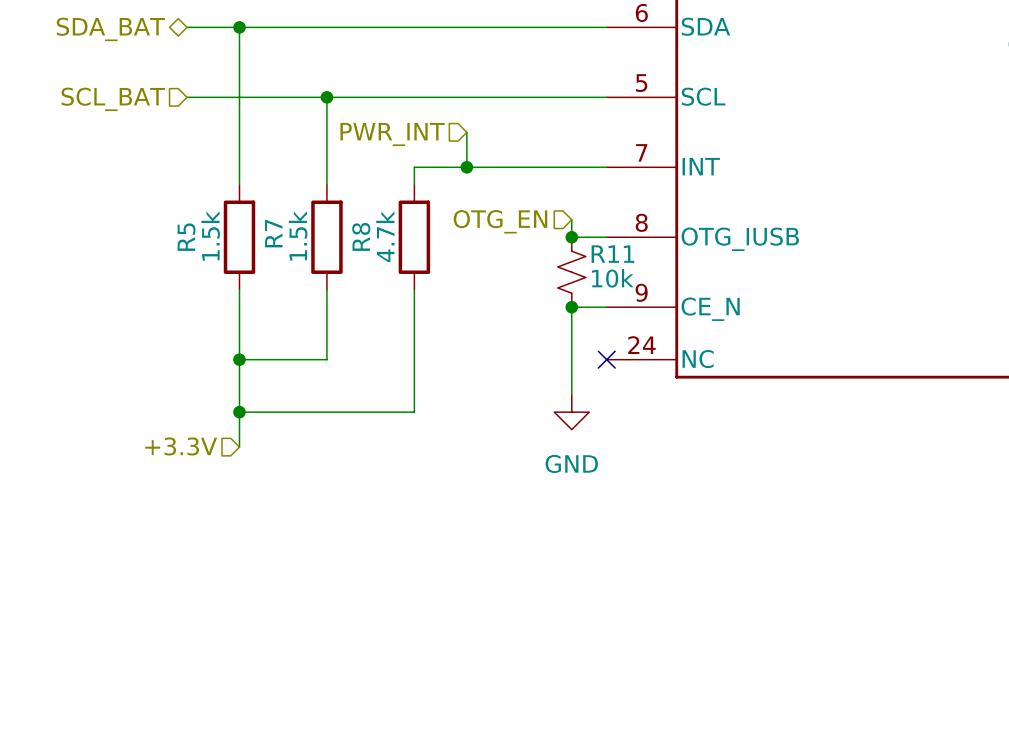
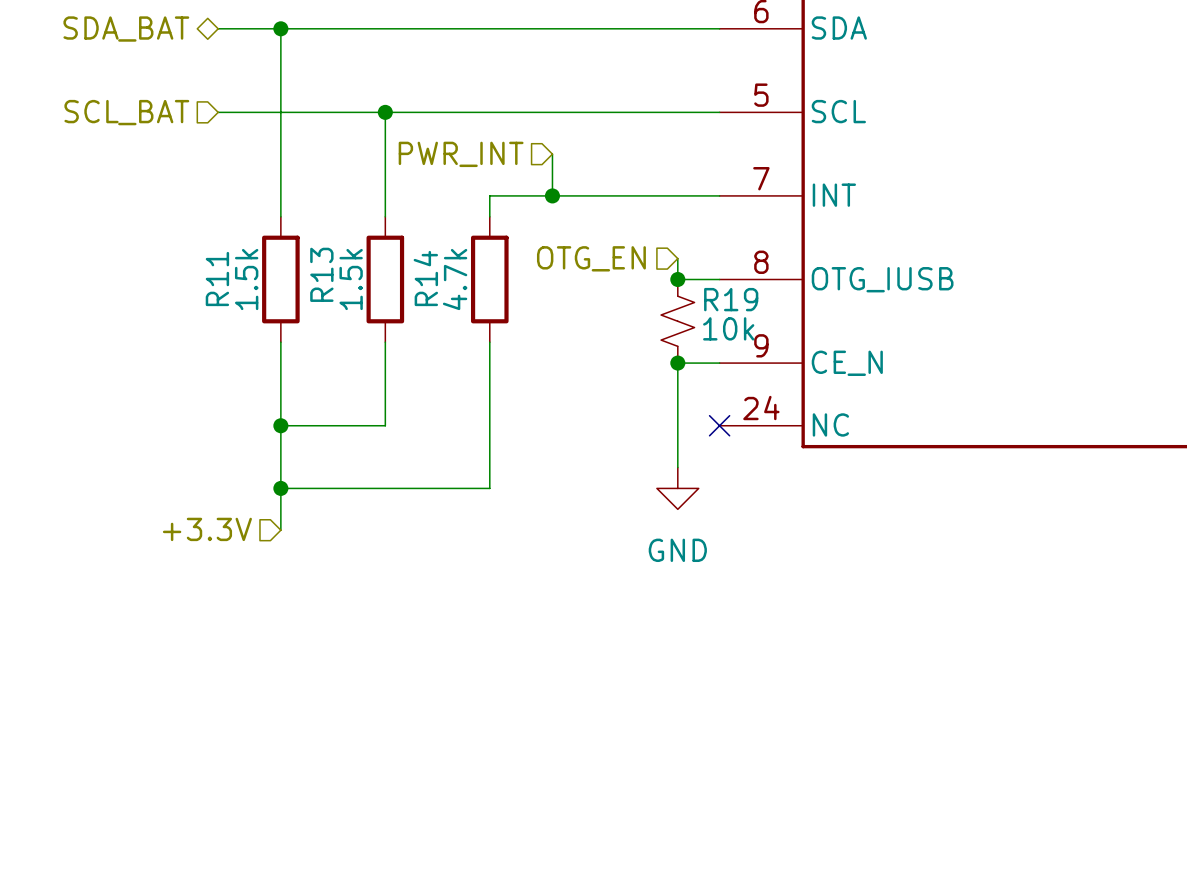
R7 name: R7 (273, 233) -> R13 (321, 274)
R8 name: R8 (361, 236) -> R14 (425, 278)
R5 name: R5 (186, 237) -> R11 (217, 279)
R11 name: R11 (612, 254) -> R19 (731, 299)

